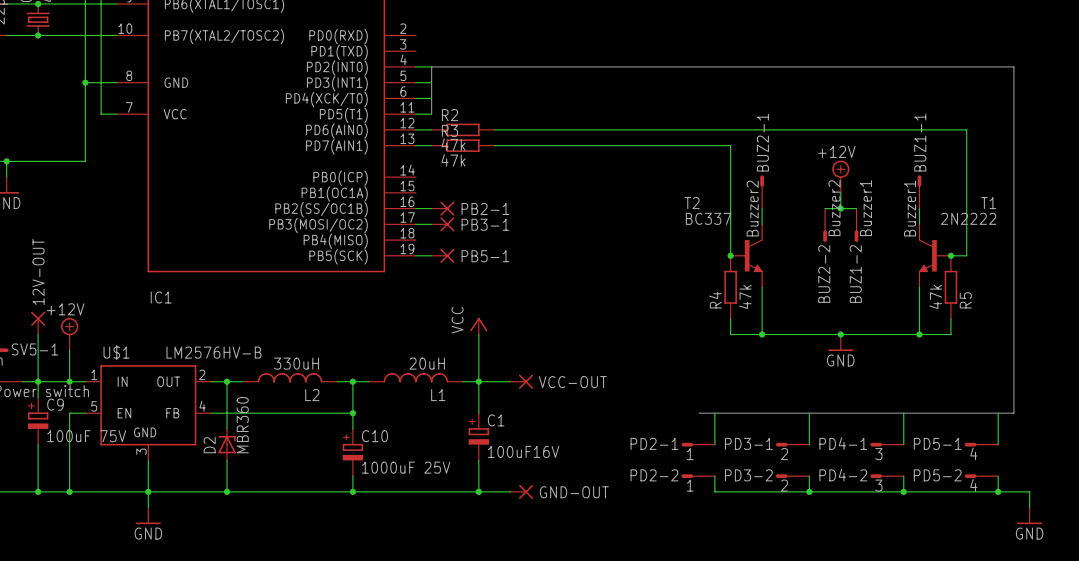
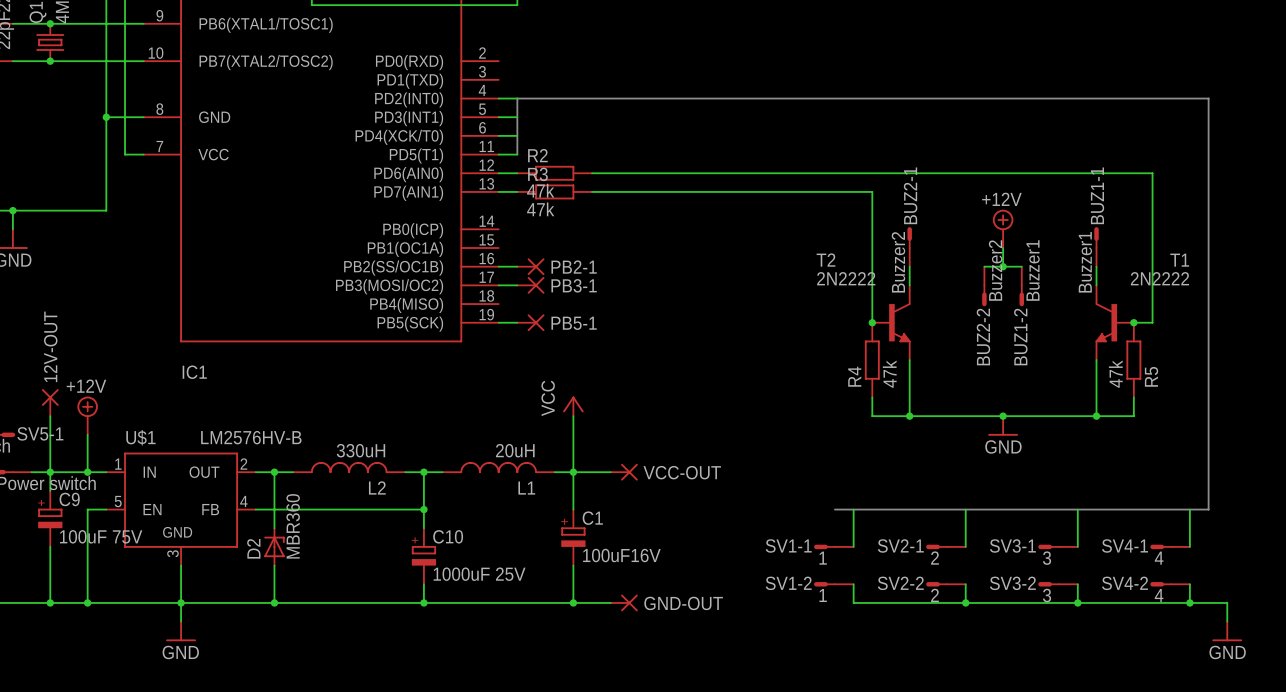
T2 value: BC337 (708, 218) -> 2N2222 (846, 278)
PD2-1 name: PD2-1 (654, 443) -> SV1-1 (788, 545)
PD3-1 name: PD3-1 (748, 443) -> SV2-1 (900, 545)
PD4-1 name: PD4-1 (843, 443) -> SV3-1 (1012, 545)
PD5-1 name: PD5-1 (937, 443) -> SV4-1 (1125, 545)
PD2-2 name: PD2-2 (654, 475) -> SV1-2 (788, 583)
PD3-2 name: PD3-2 (748, 475) -> SV2-2 (900, 583)
PD4-2 name: PD4-2 (843, 475) -> SV3-2 (1012, 583)
PD5-2 name: PD5-2 (937, 475) -> SV4-2 (1125, 583)

